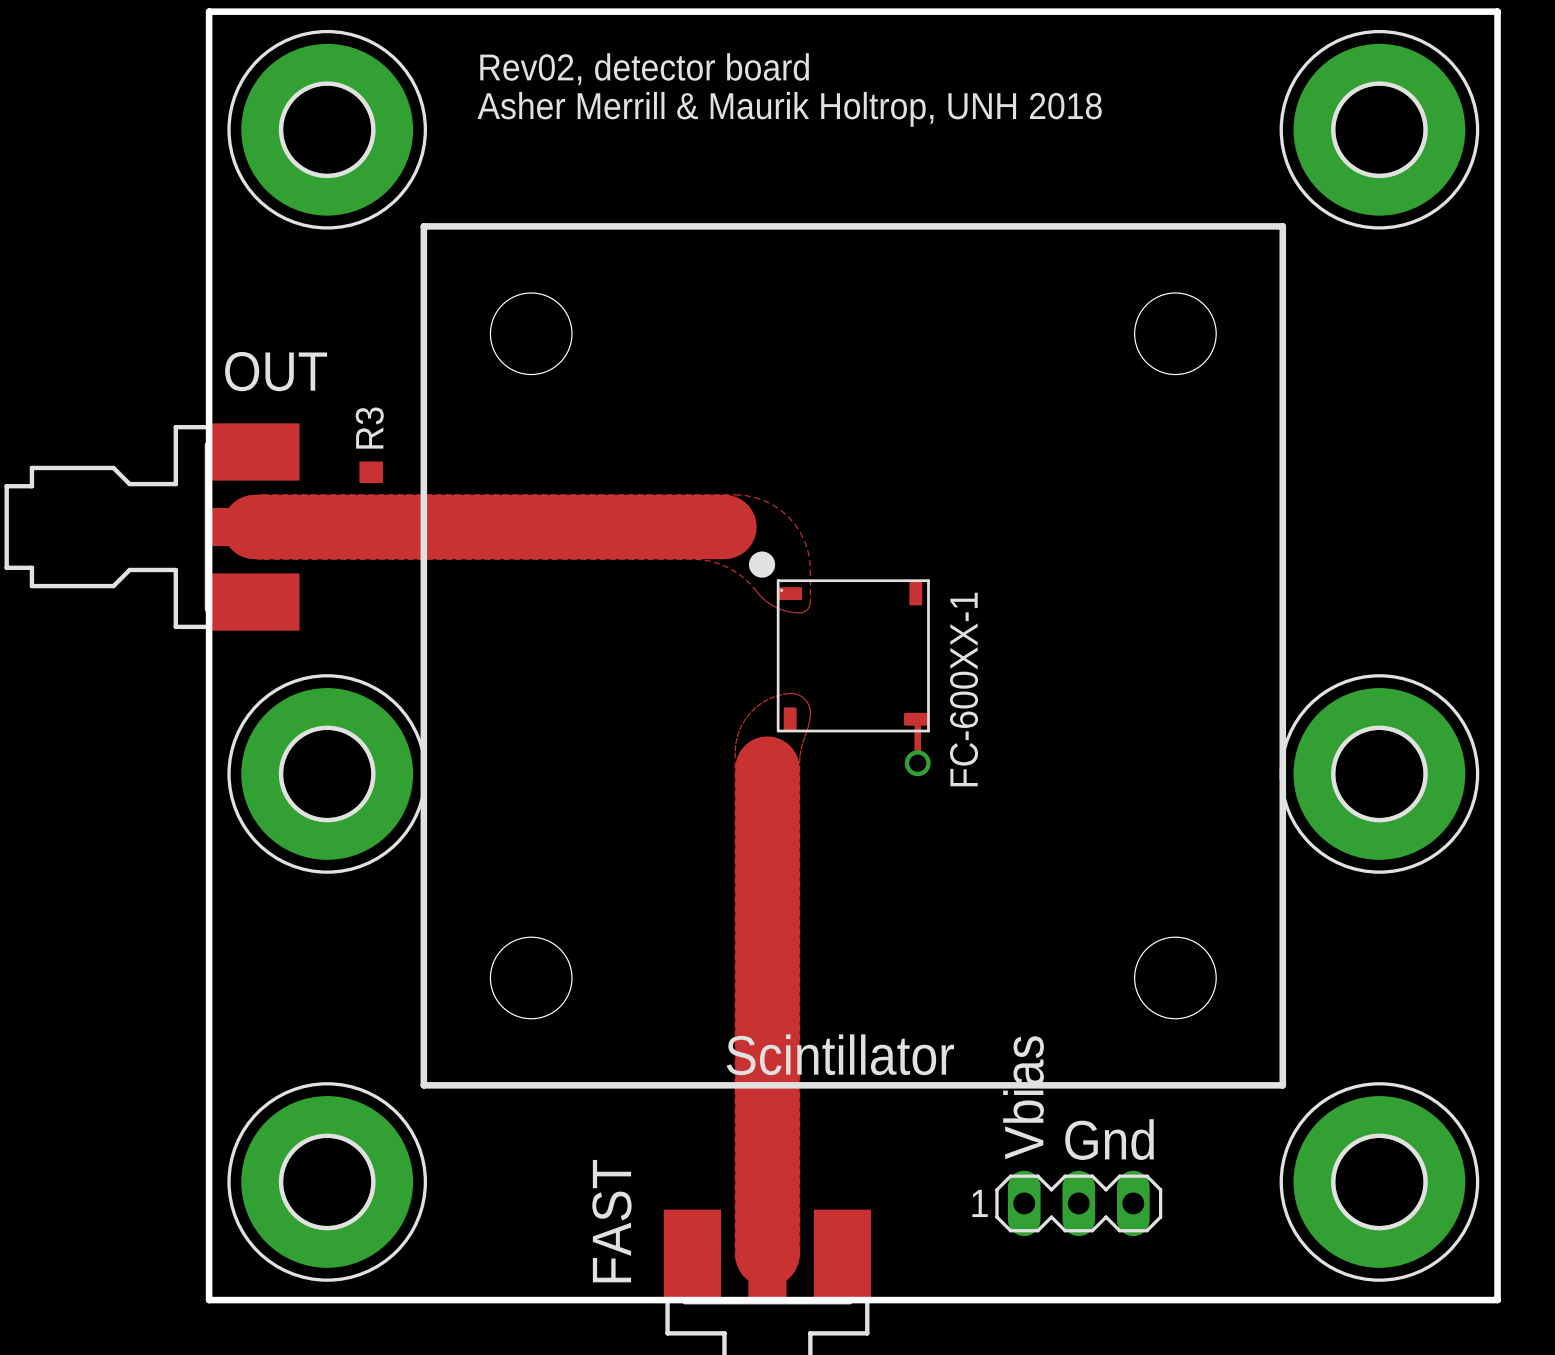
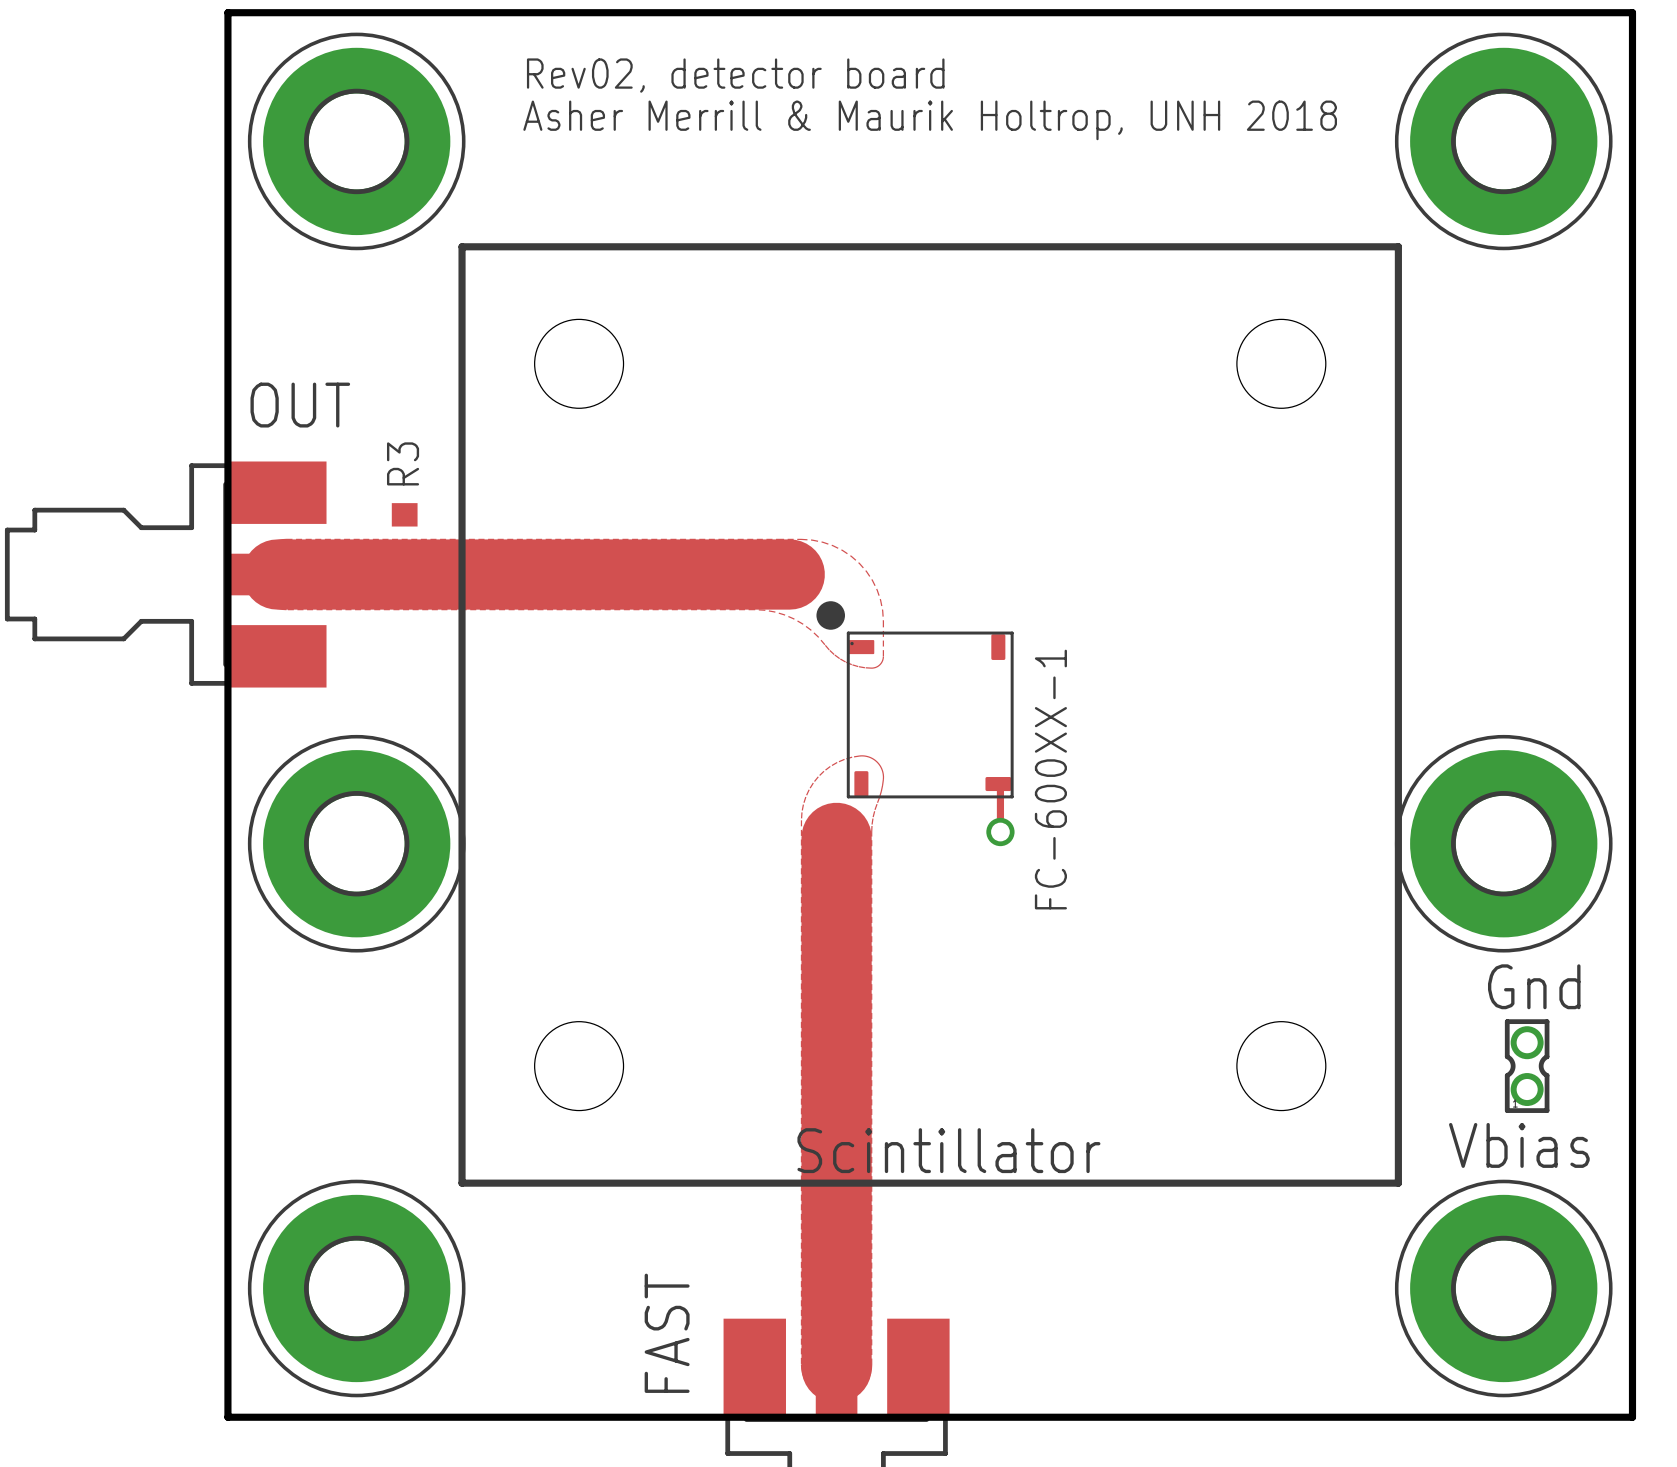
part: none -> (1527, 1066)
text rotation: 0° (1023, 1097) -> 90° clockwise (1519, 1145)
text position: Vbias (1023, 1097) -> Vbias (1519, 1145)
text position: Gnd (1109, 1139) -> Gnd (1534, 986)
part: (1078, 1203) -> none

